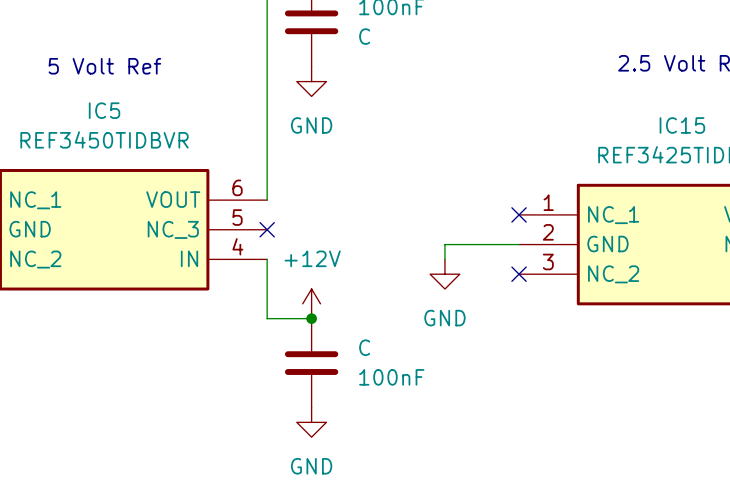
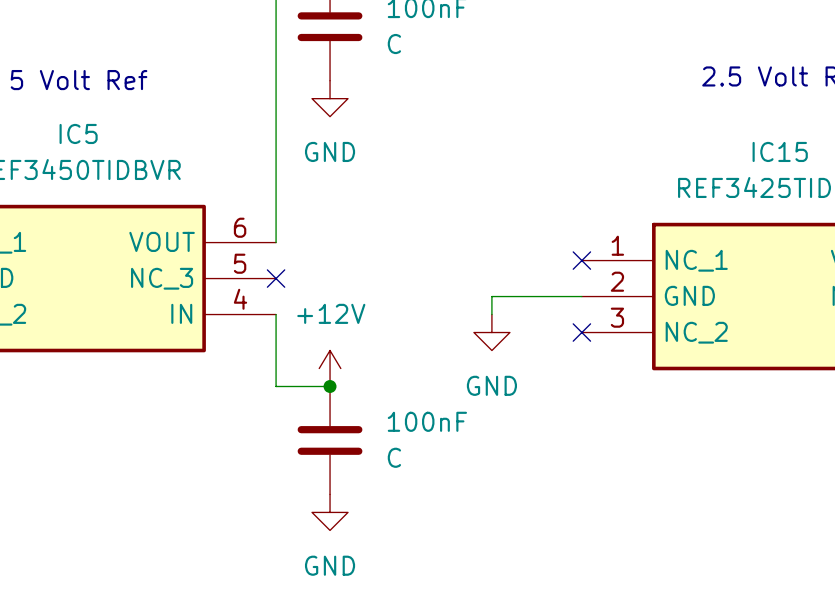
C name: C (364, 347) -> 100nF (427, 421)
C value: 100nF (391, 377) -> C (394, 457)

